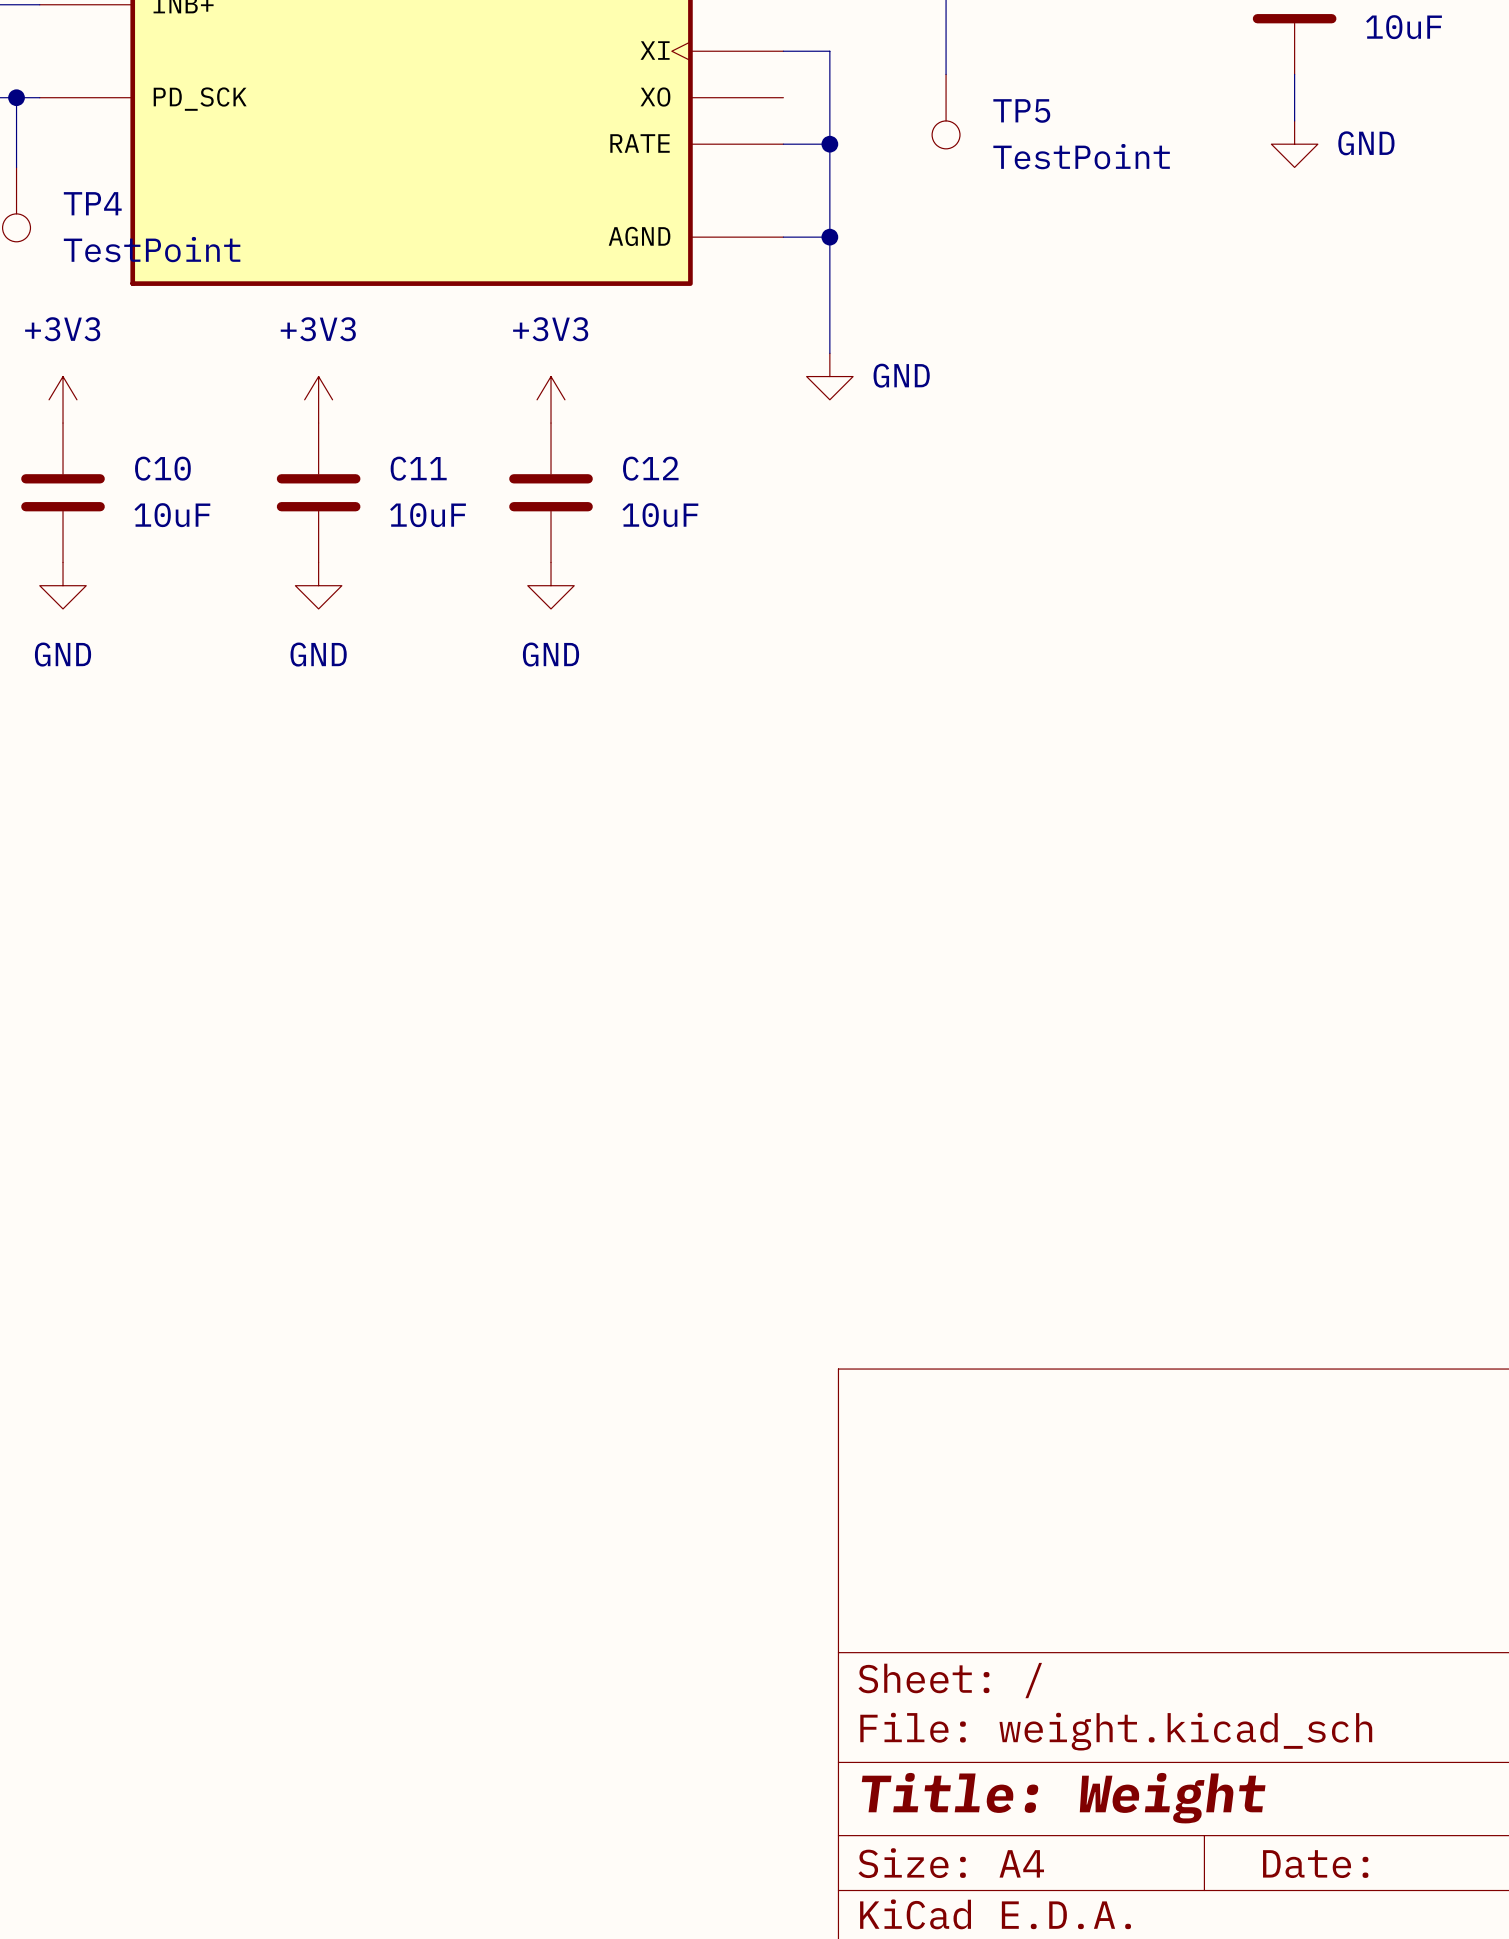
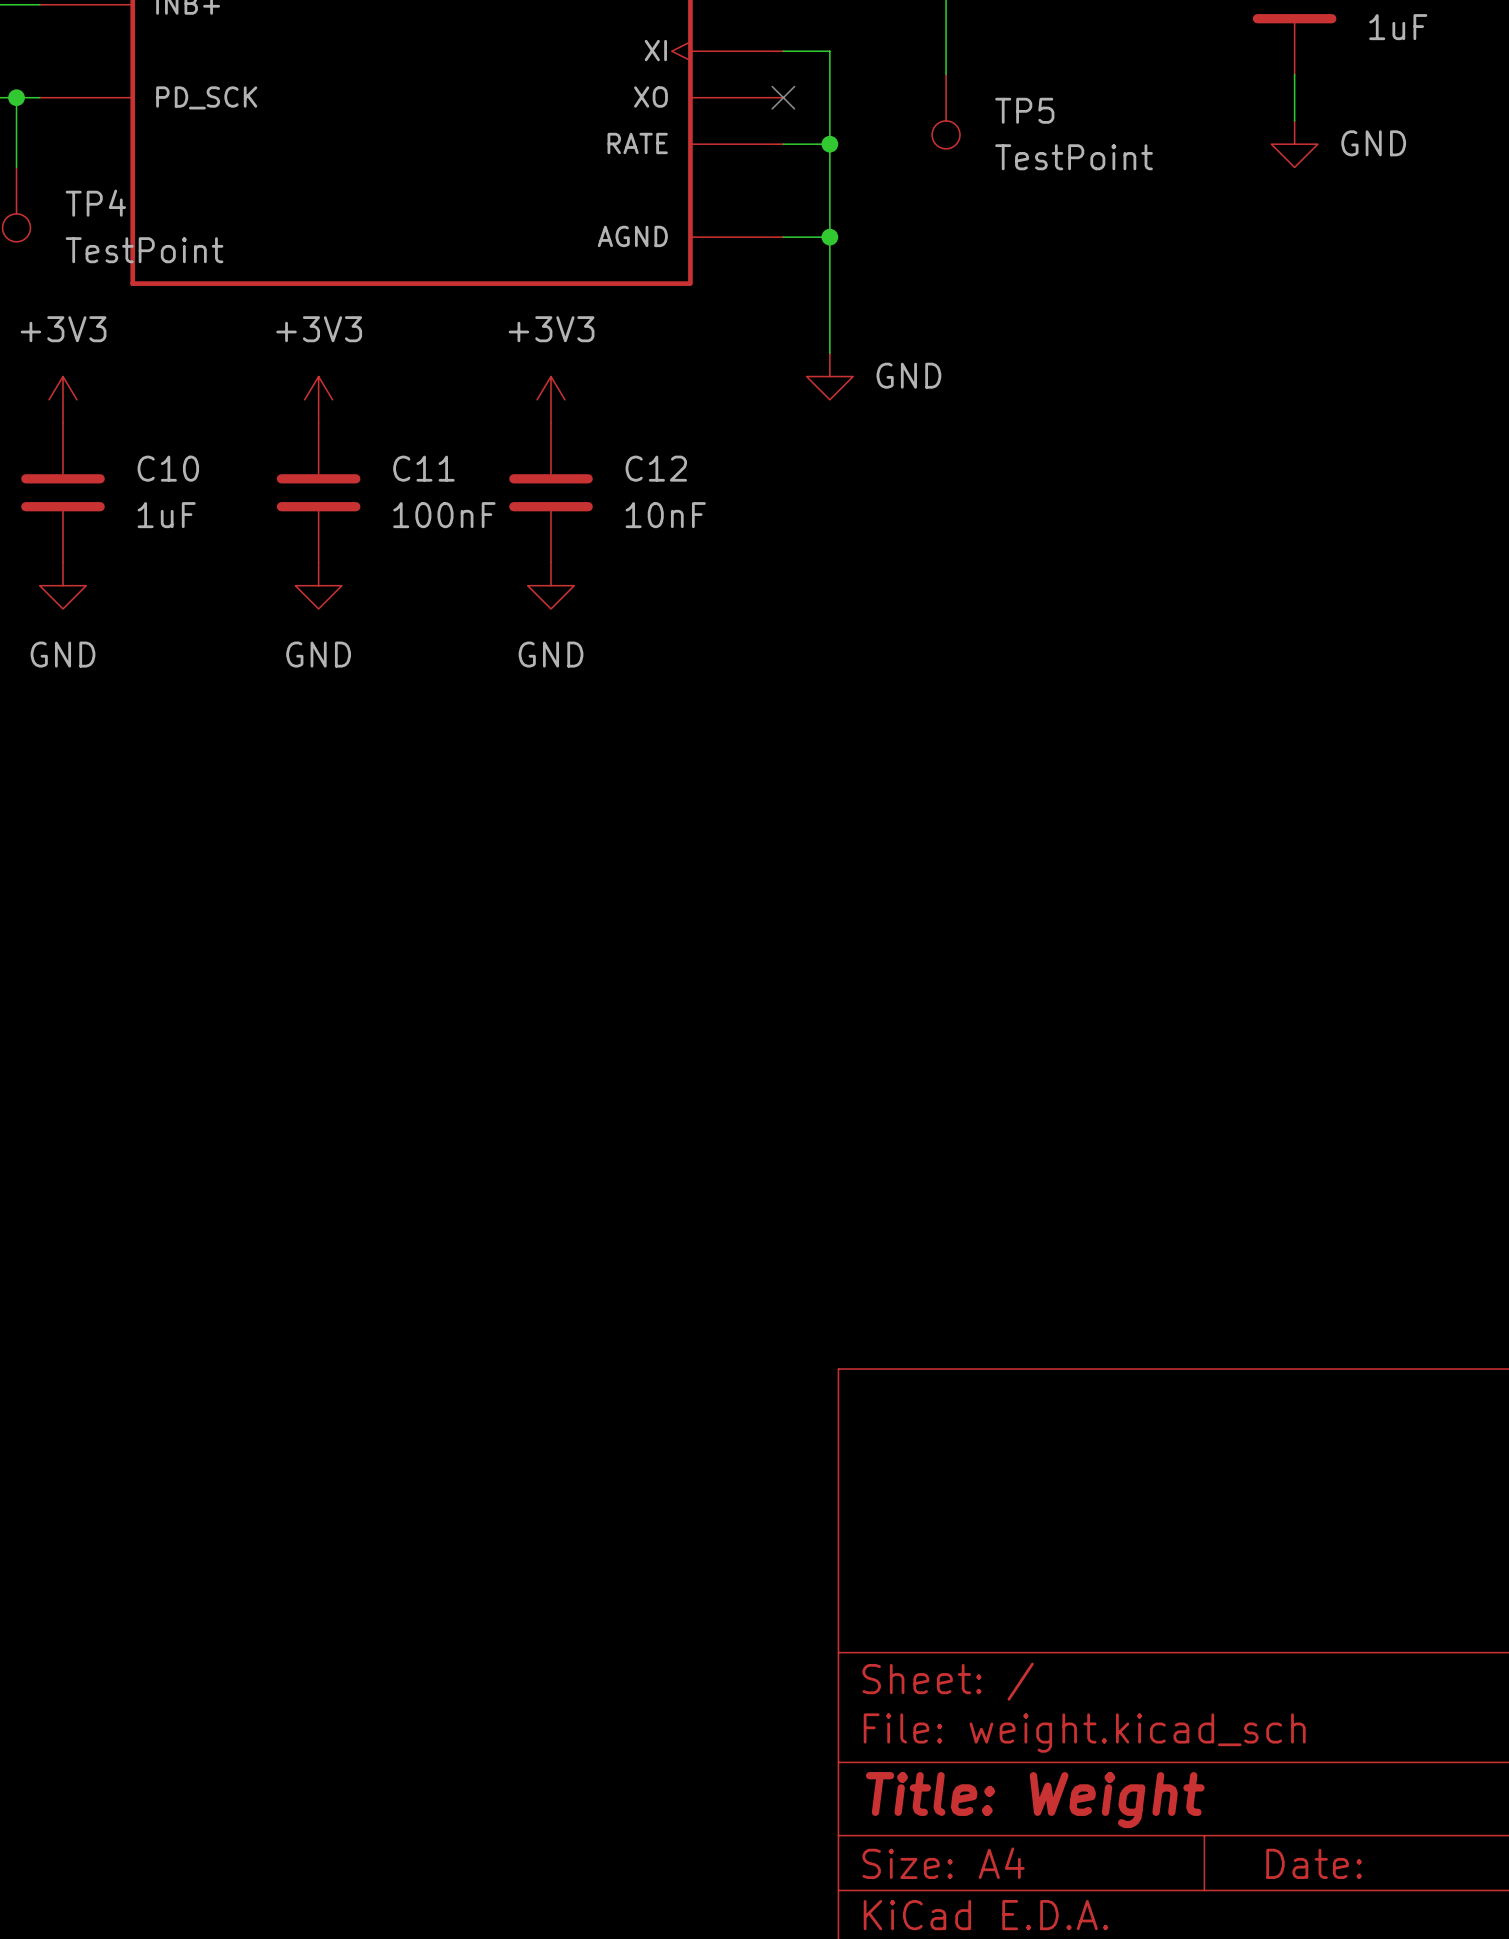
part value: 10uF (1404, 27) -> 1uF (1398, 27)
no-connect mark: none -> (783, 97)
C10 value: 10uF (172, 515) -> 1uF (166, 515)
C11 value: 10uF (428, 515) -> 100nF (444, 515)
C12 value: 10uF (660, 515) -> 10nF (665, 515)

